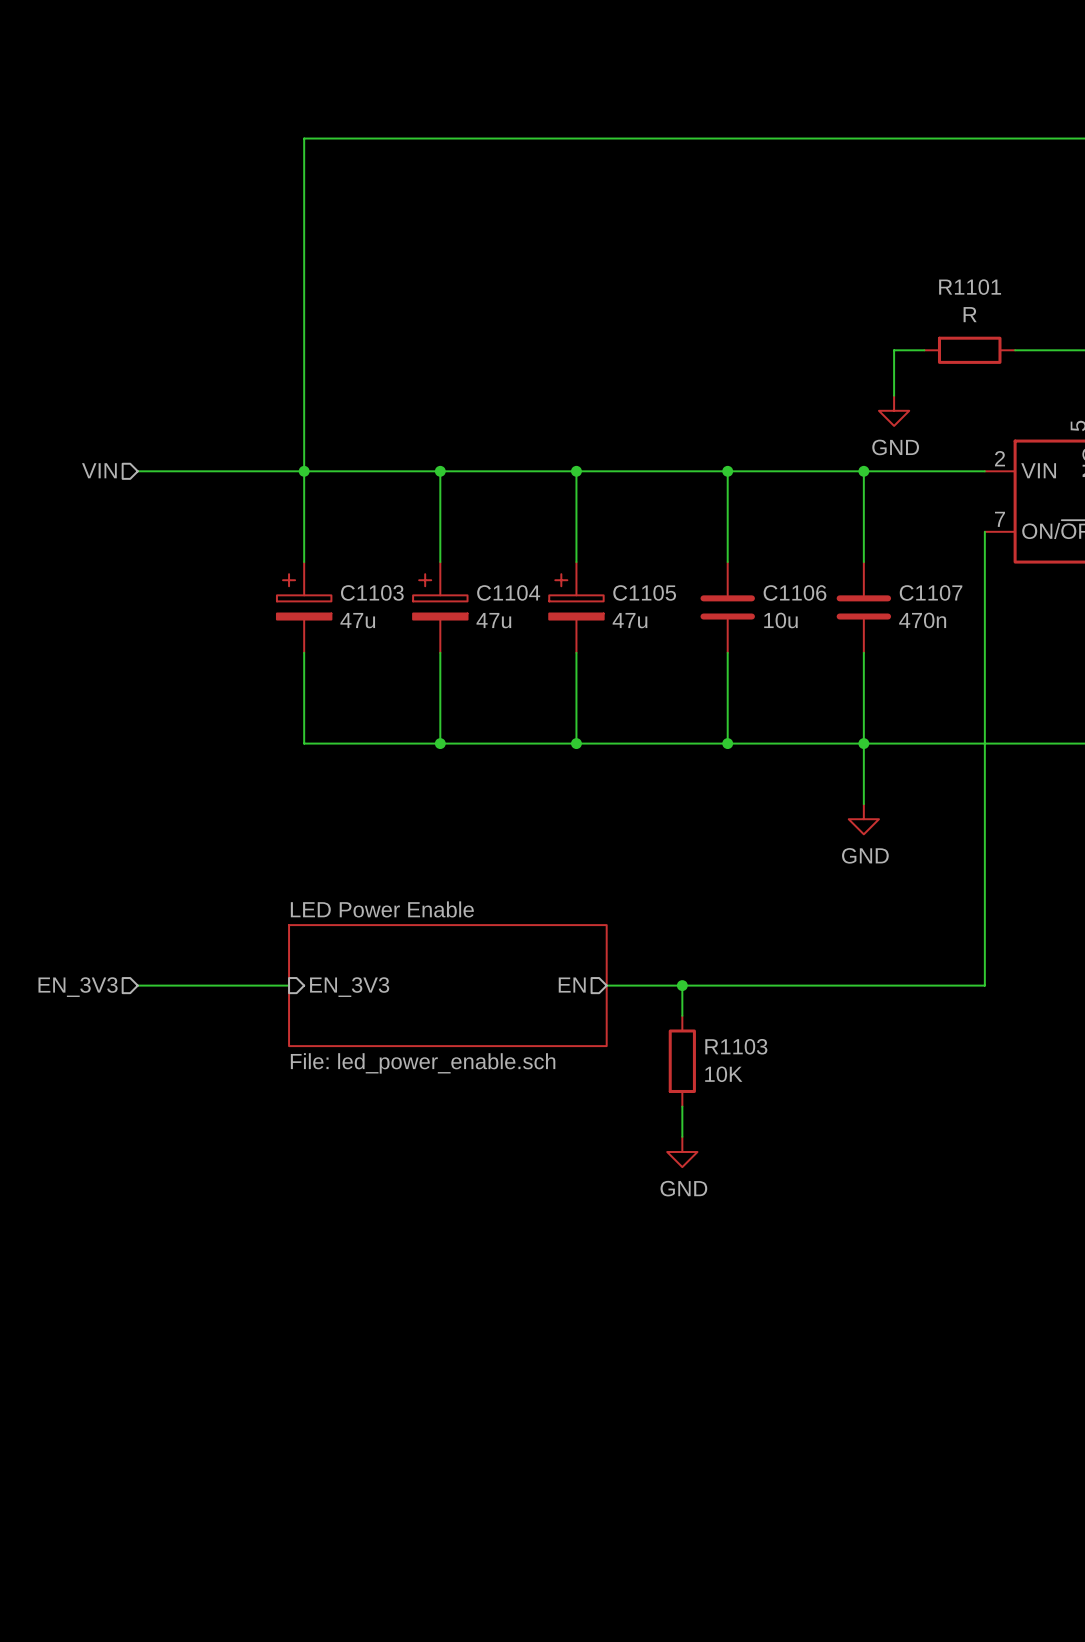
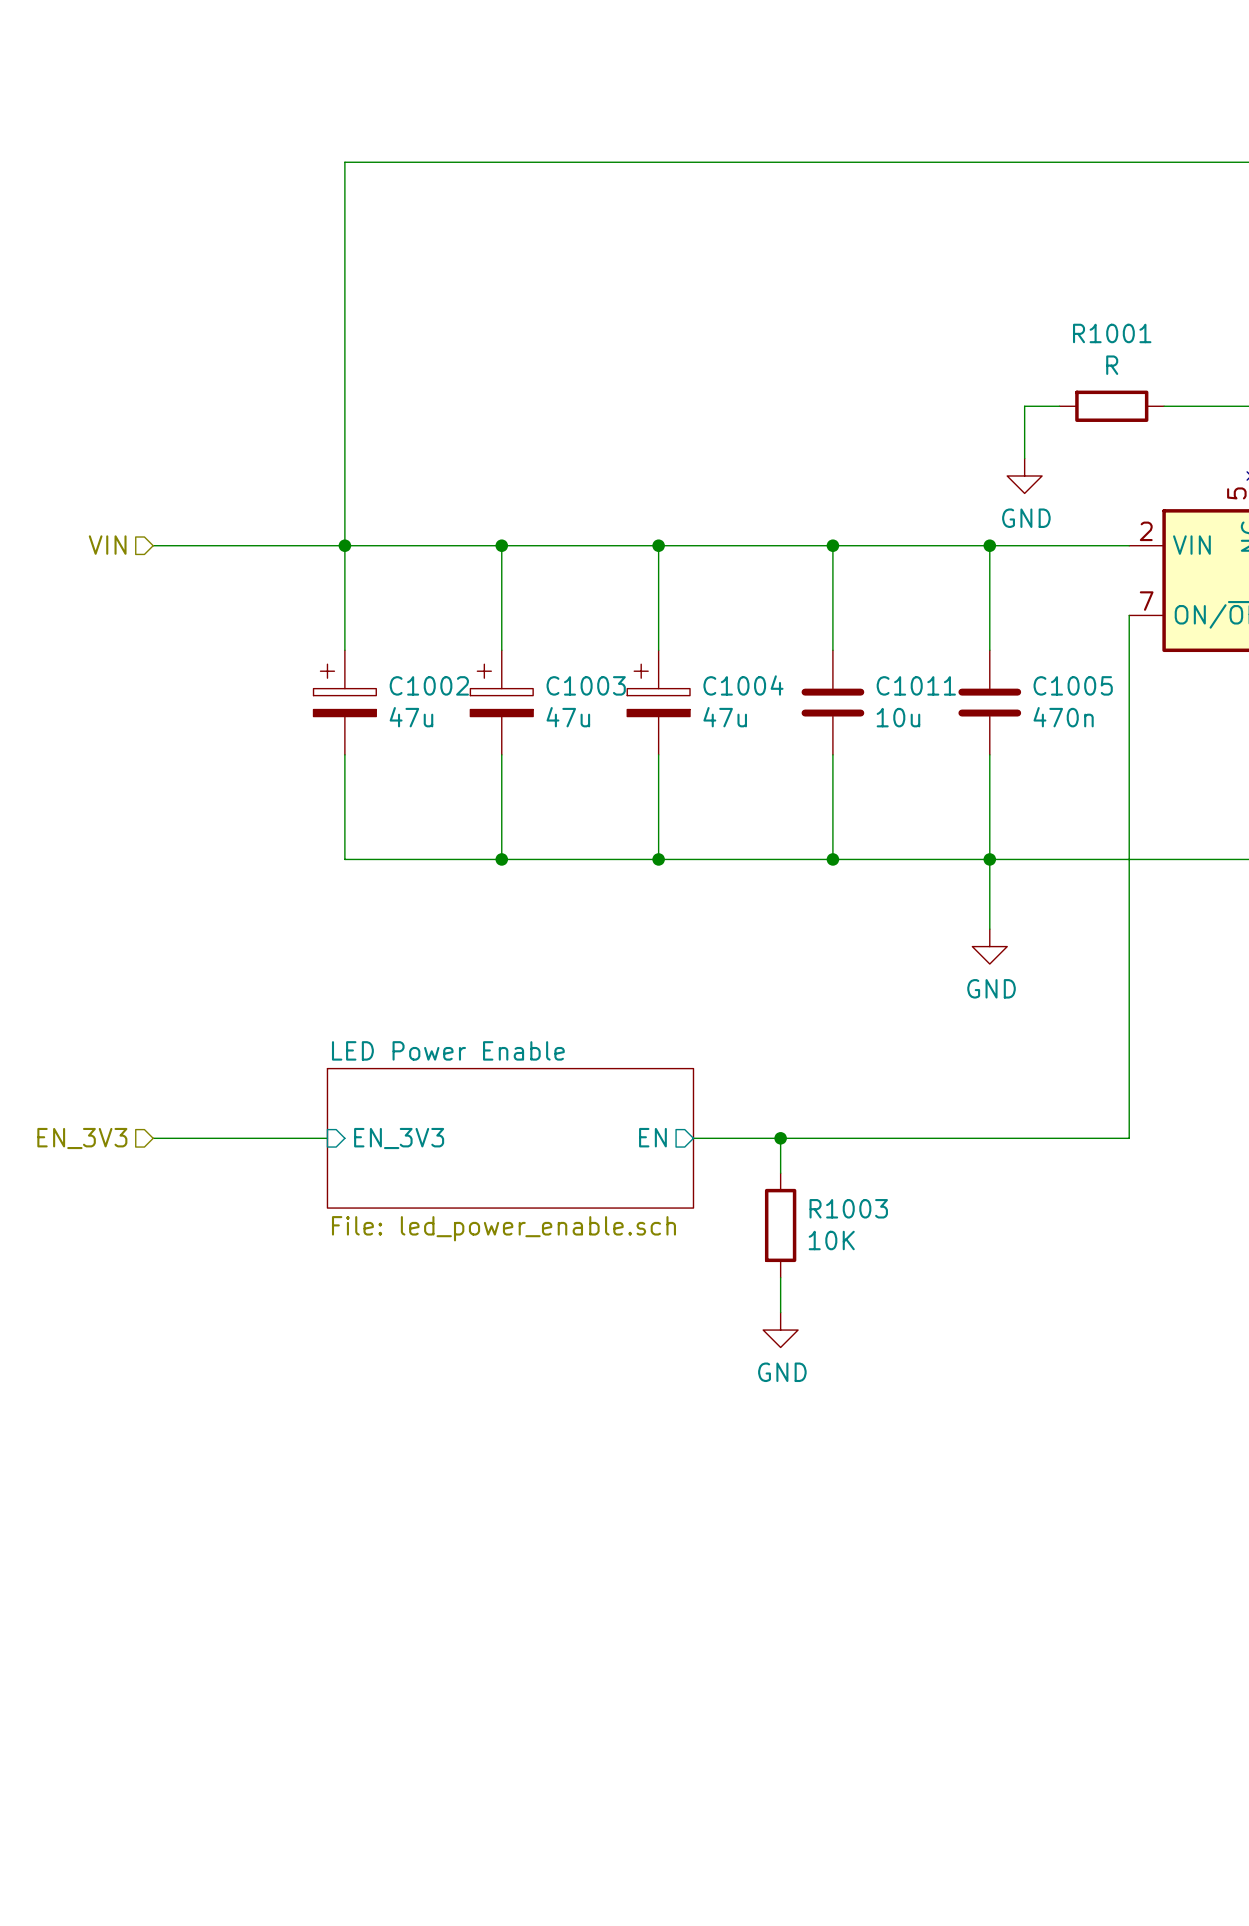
R1101 name: R1101 (970, 287) -> R1001 (1112, 333)
C1103 name: C1103 (372, 592) -> C1002 (429, 685)
C1104 name: C1104 (508, 592) -> C1003 (586, 685)
C1105 name: C1105 (644, 592) -> C1004 (743, 685)
C1106 name: C1106 (794, 592) -> C1011 (916, 685)
C1107 name: C1107 (931, 592) -> C1005 (1073, 685)
R1103 name: R1103 (736, 1046) -> R1003 (848, 1208)

